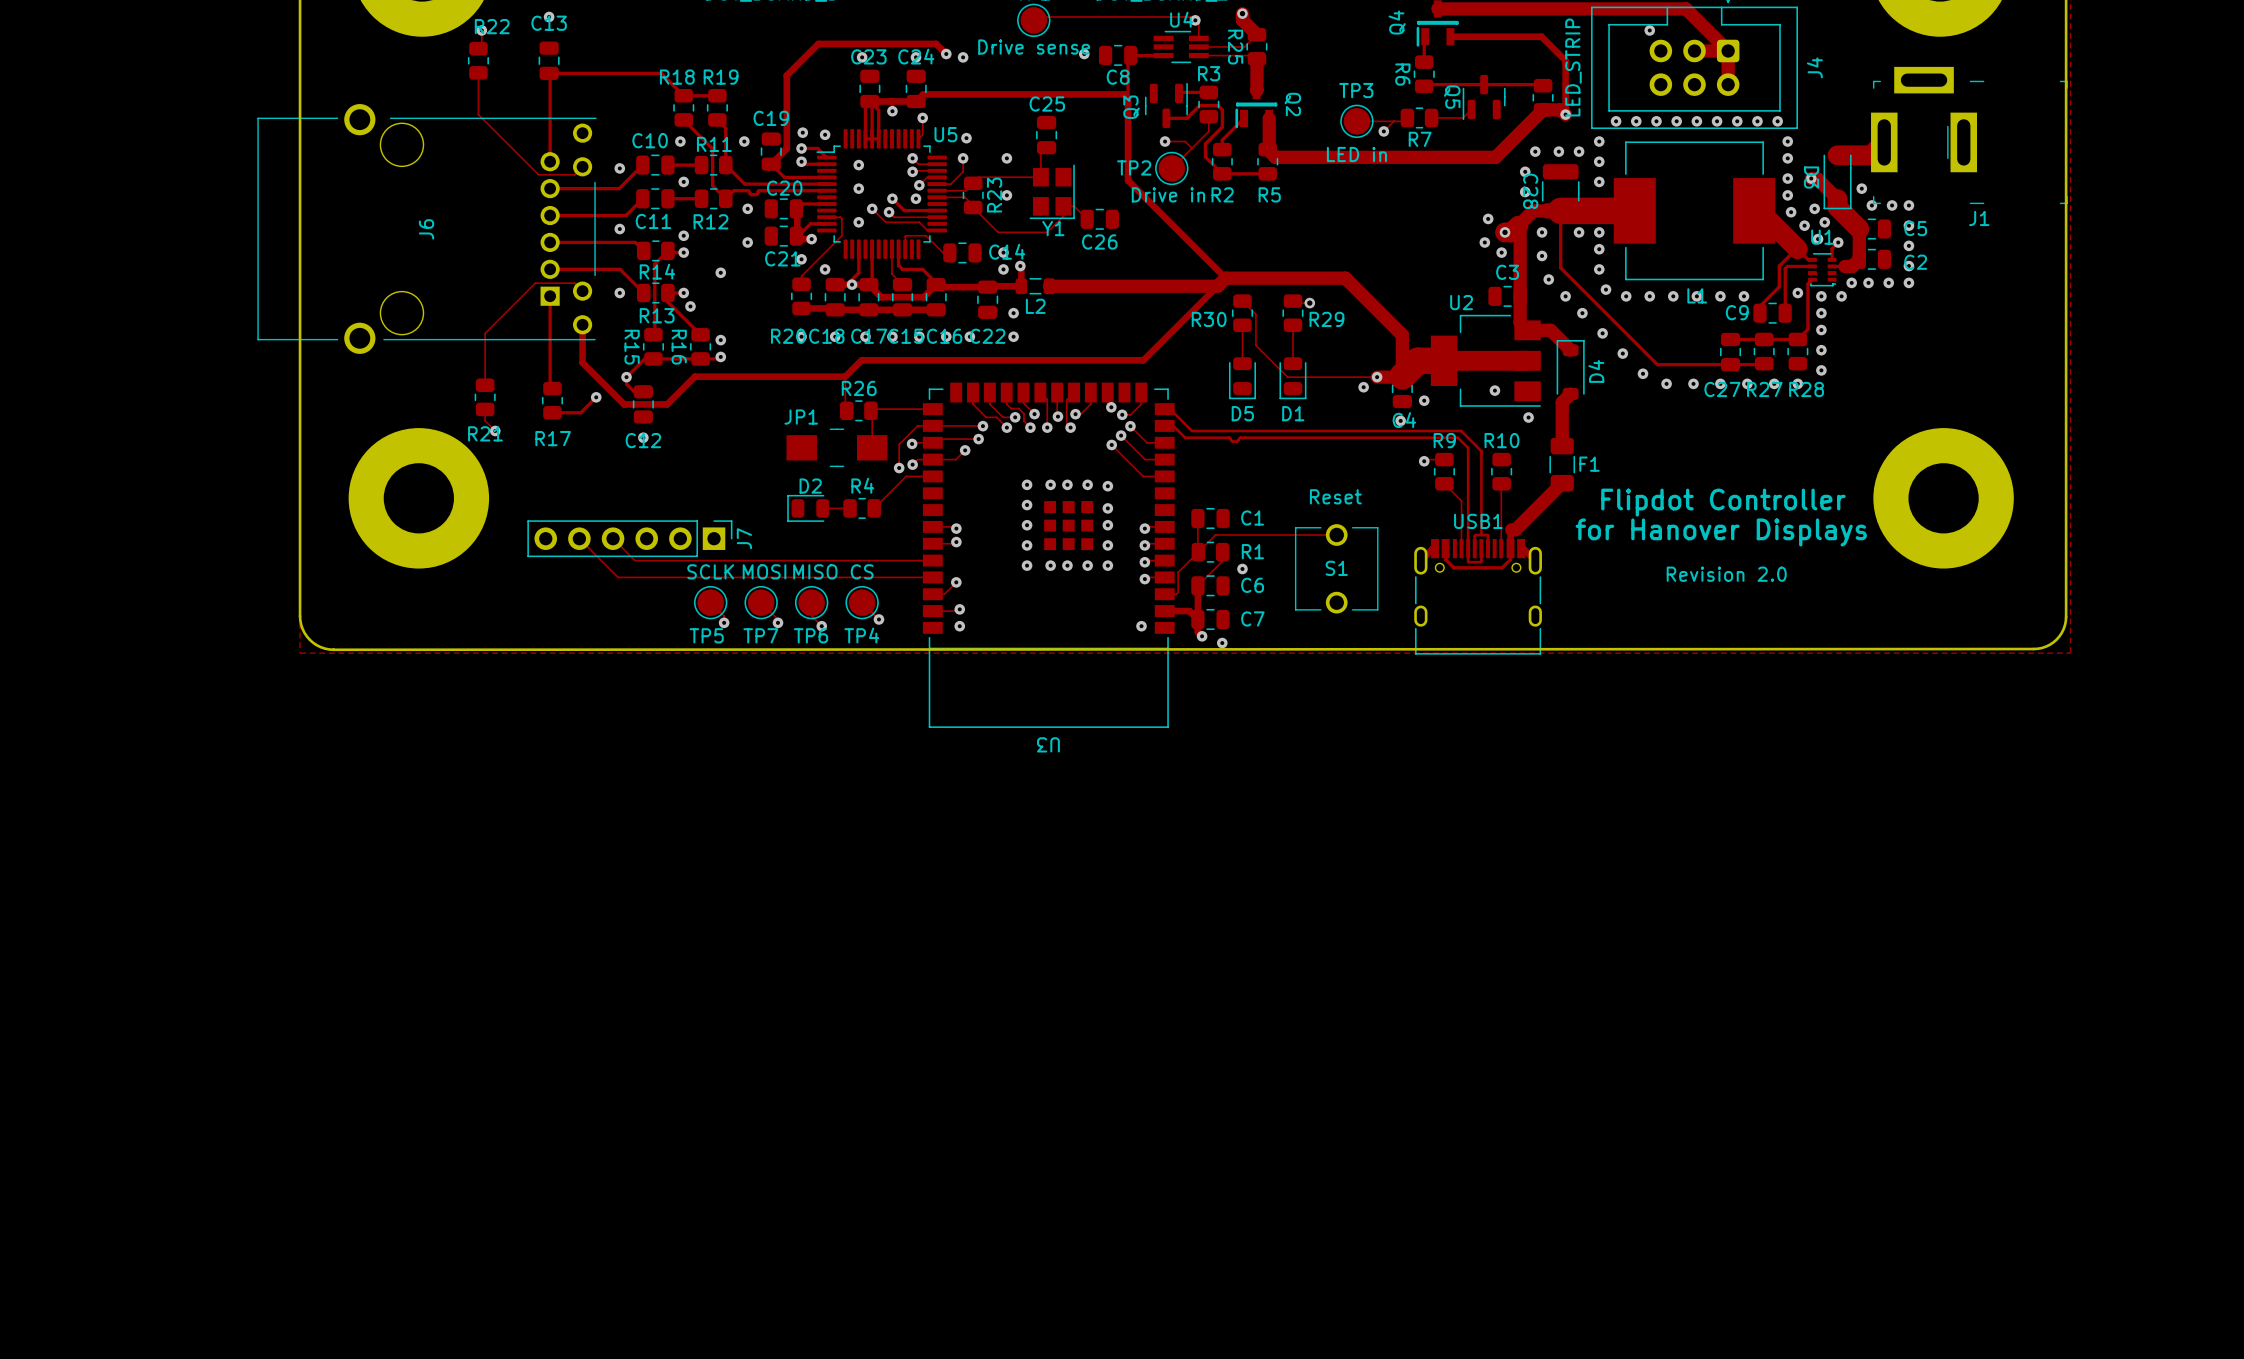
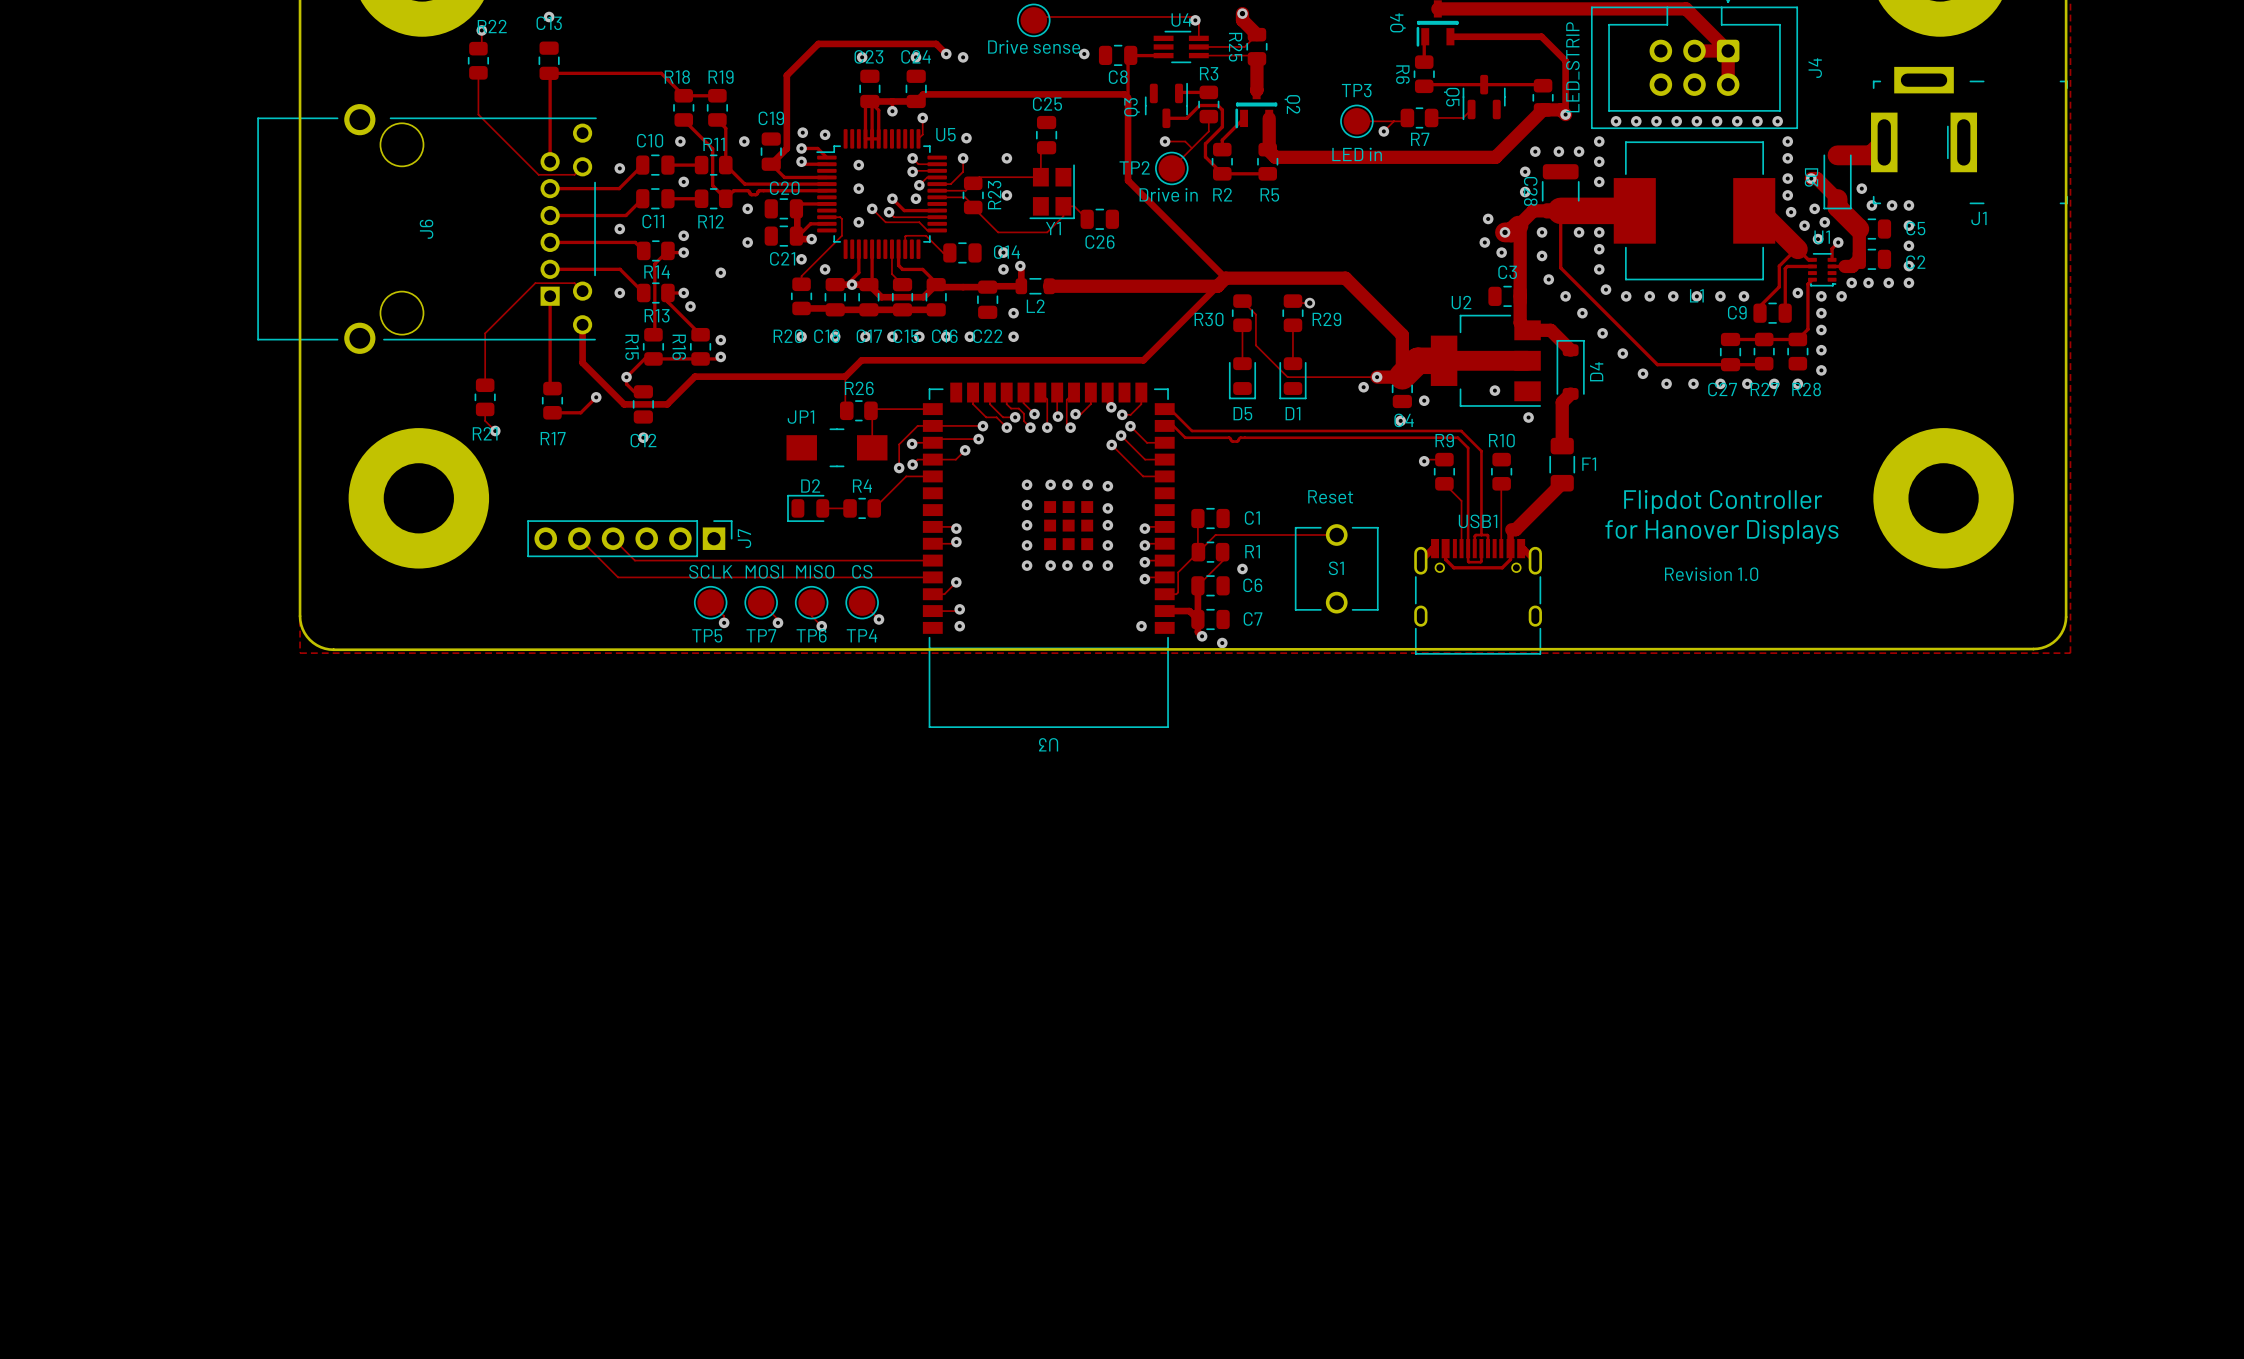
via: (1649, 30) -> none
text: Revision 2.0 (1726, 574) -> Revision 1.0 (1711, 574)

